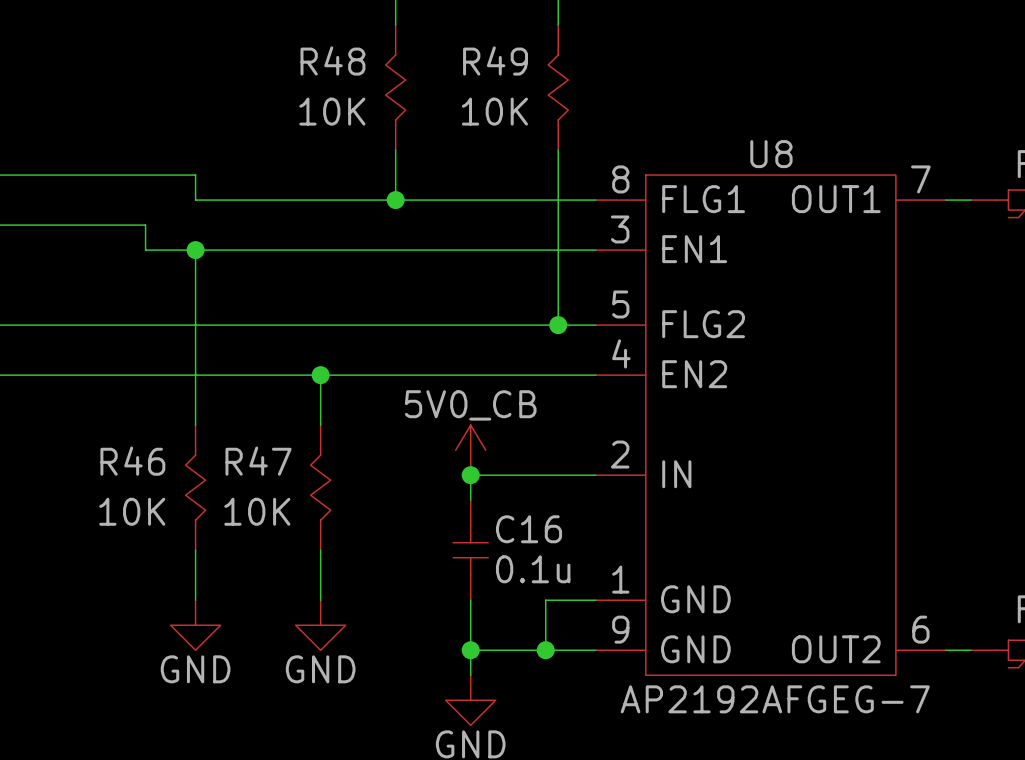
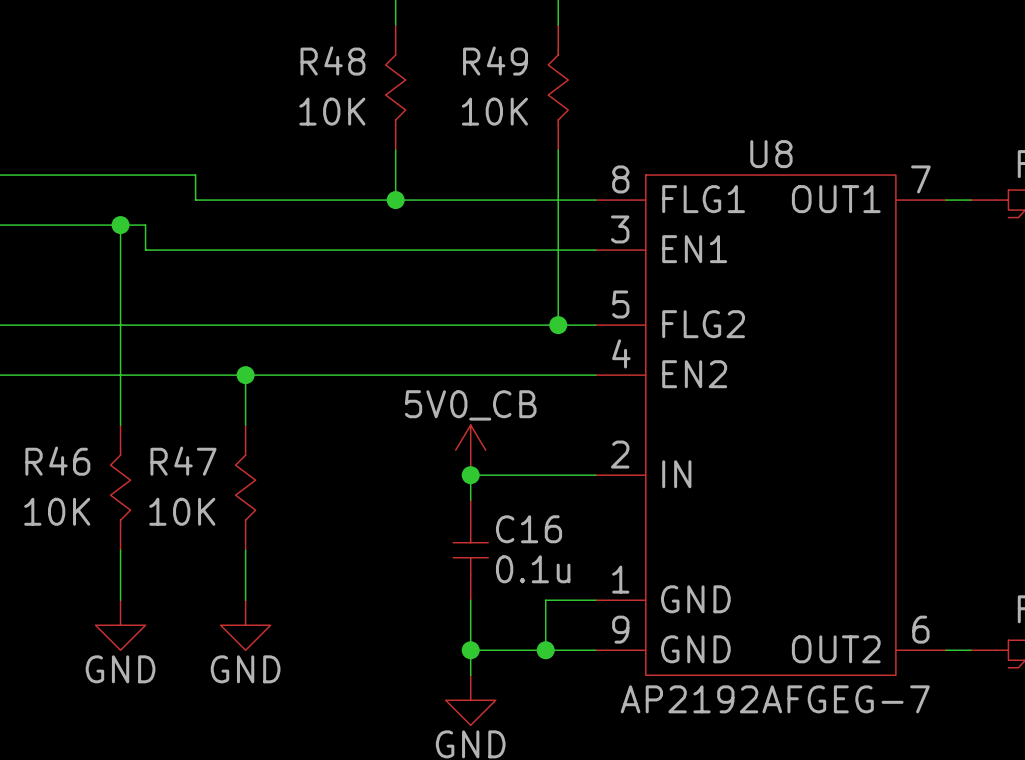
wire: none -> (120, 225) (120, 425)
junction: none -> (120, 225)
wire: (195, 250) (195, 425) -> none
junction: (195, 250) -> none
junction: none -> (245, 375)
wire: (320, 375) (320, 425) -> (245, 375) (245, 425)
junction: (320, 375) -> none
R46 position: (195, 487) -> (120, 487)
R47 position: (320, 487) -> (245, 487)
wire: (195, 550) (195, 600) -> (120, 550) (120, 600)
wire: (320, 550) (320, 600) -> (245, 550) (245, 600)
power symbol: none -> GND (120, 625)
power symbol: GND (195, 625) -> none
power symbol: none -> GND (245, 625)
power symbol: GND (320, 625) -> none

